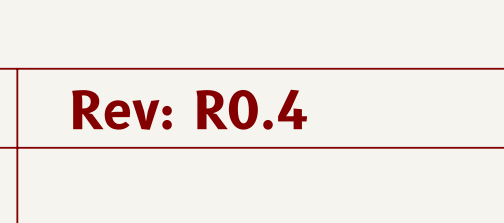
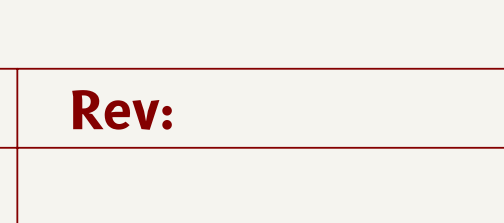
title block: Rev: R0.4 (189, 109) -> Rev: (122, 109)

